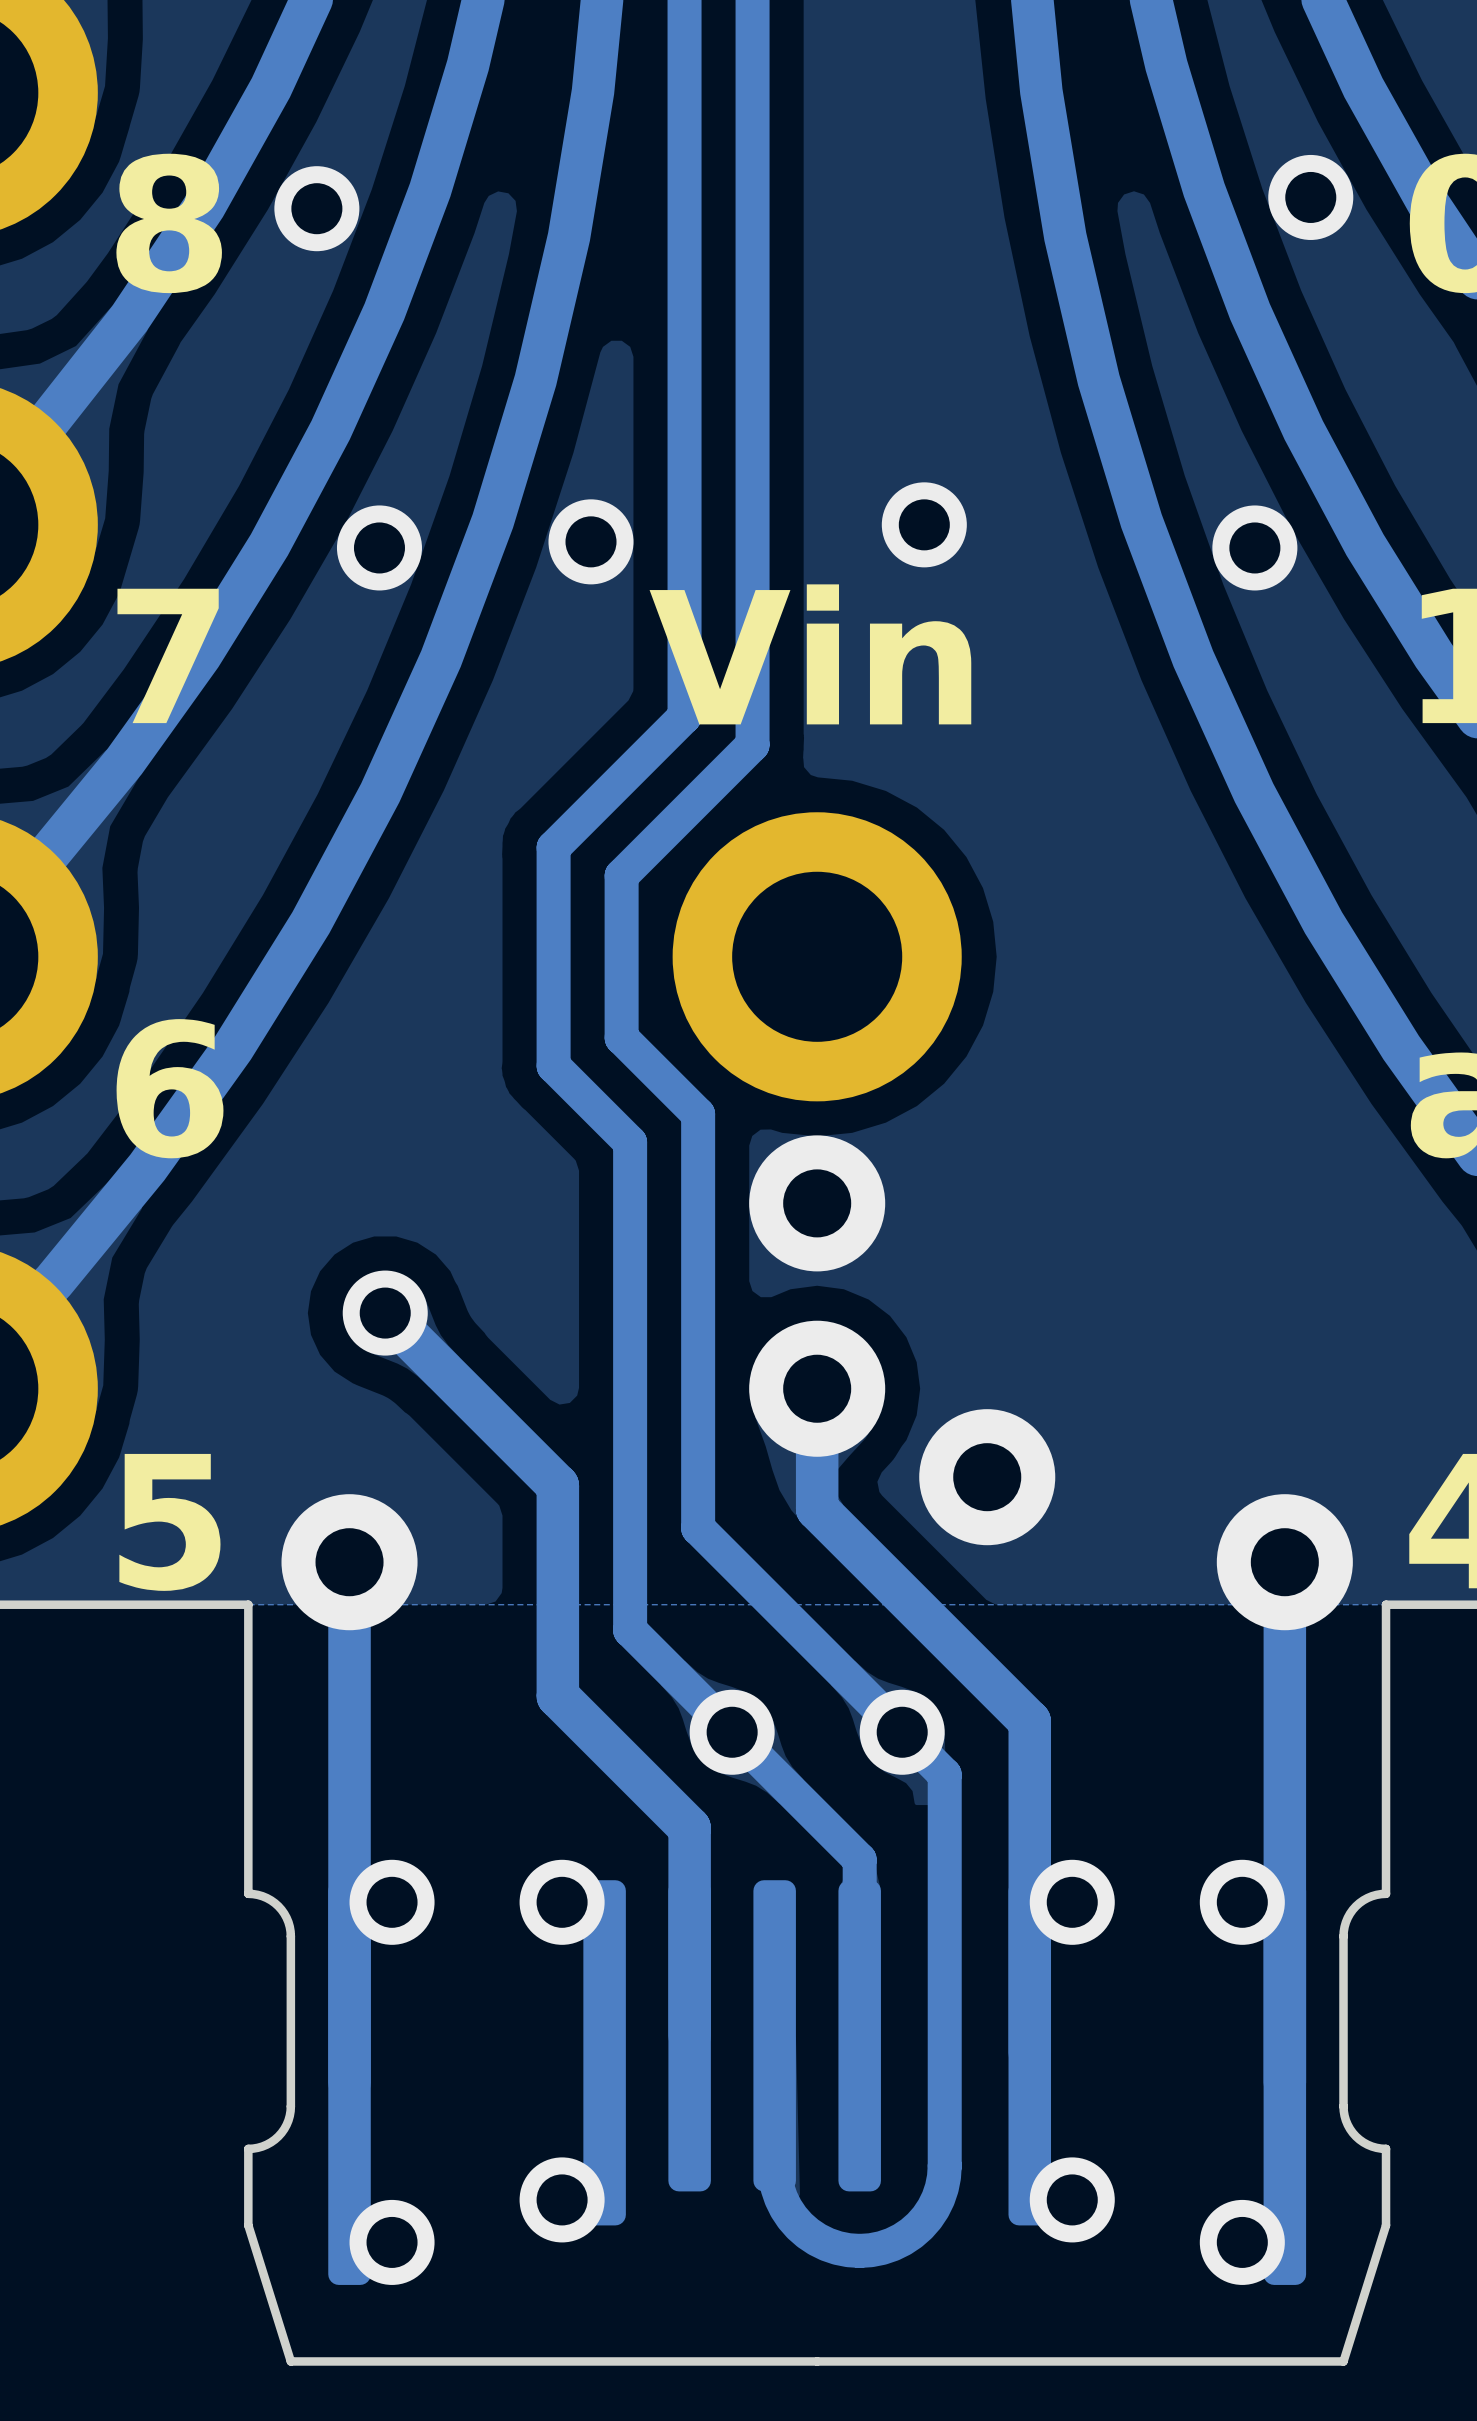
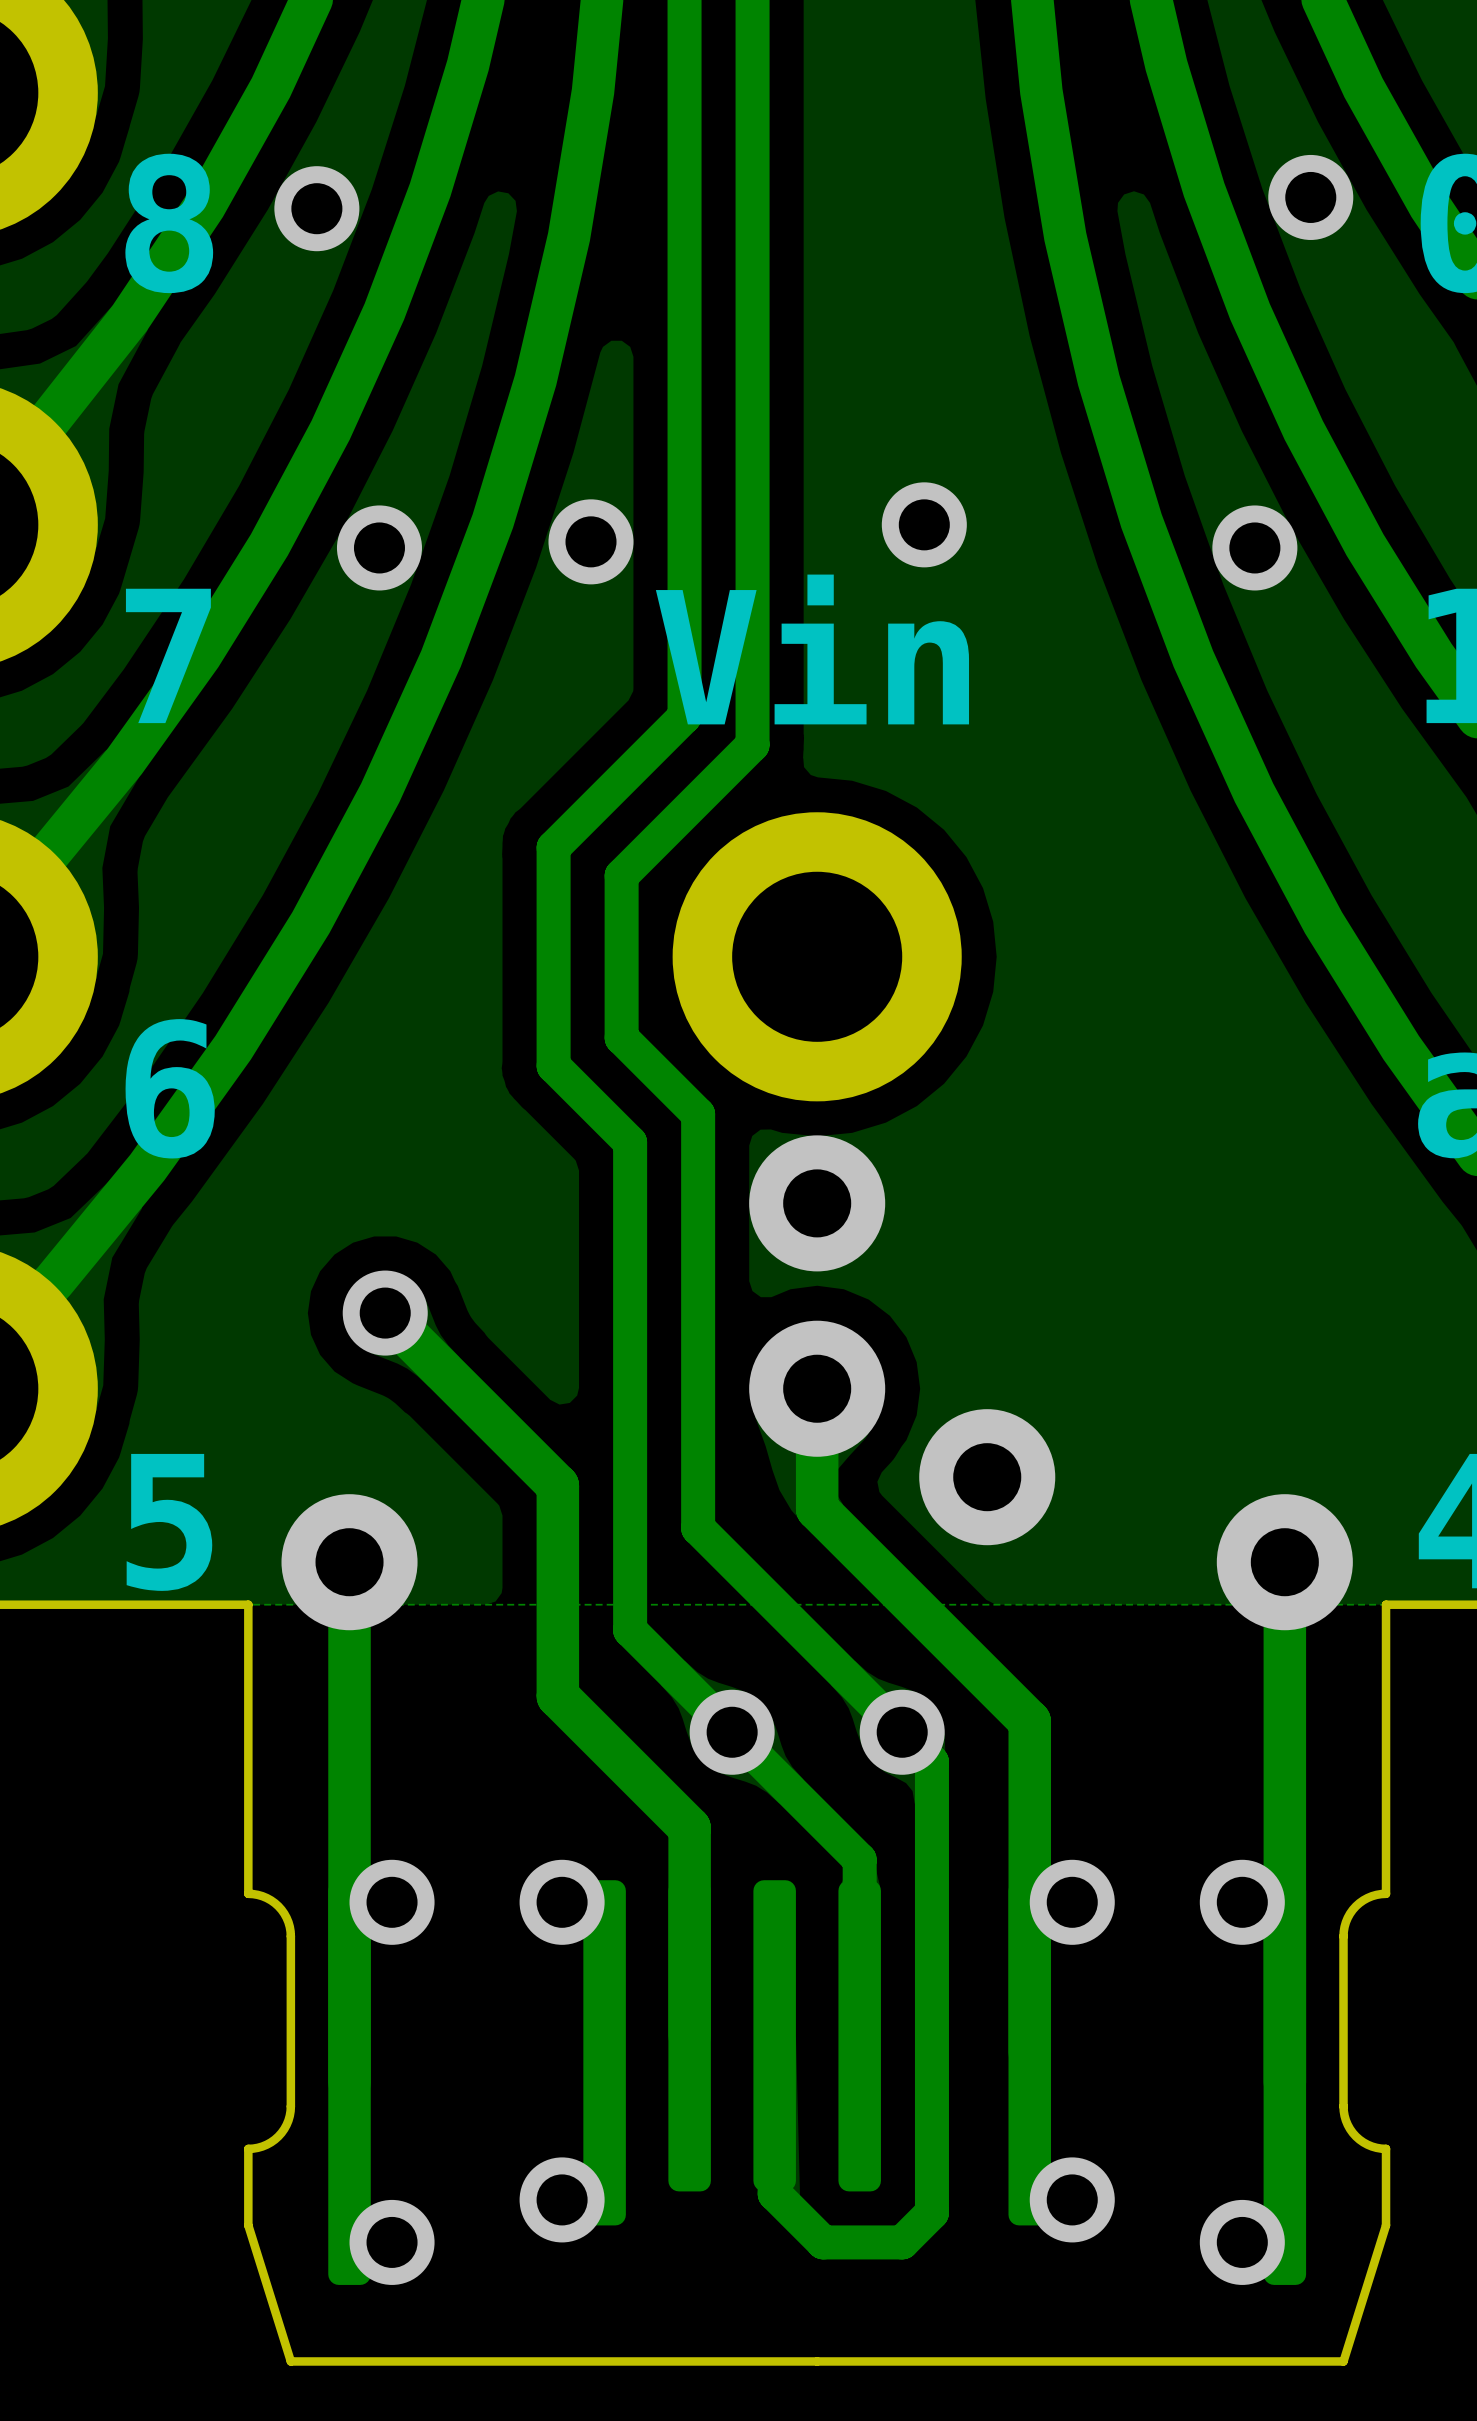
track: (931, 1762) (944, 1774) (944, 2165) (938, 2198) (919, 2226) (902, 2239) (870, 2250) (848, 2250) (817, 2239) (792, 2217) (777, 2187) (774, 2165) -> (931, 1762) (931, 2212) (902, 2242) (823, 2242) (774, 2193) (774, 2165)

